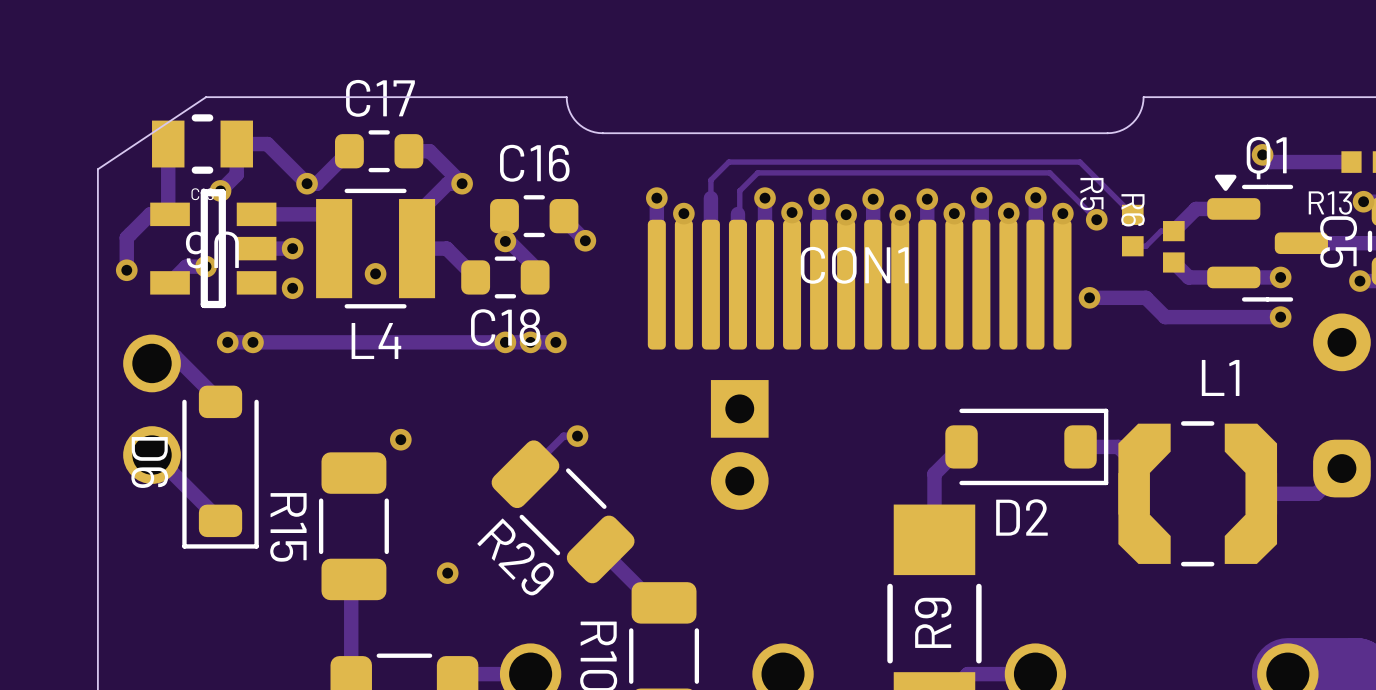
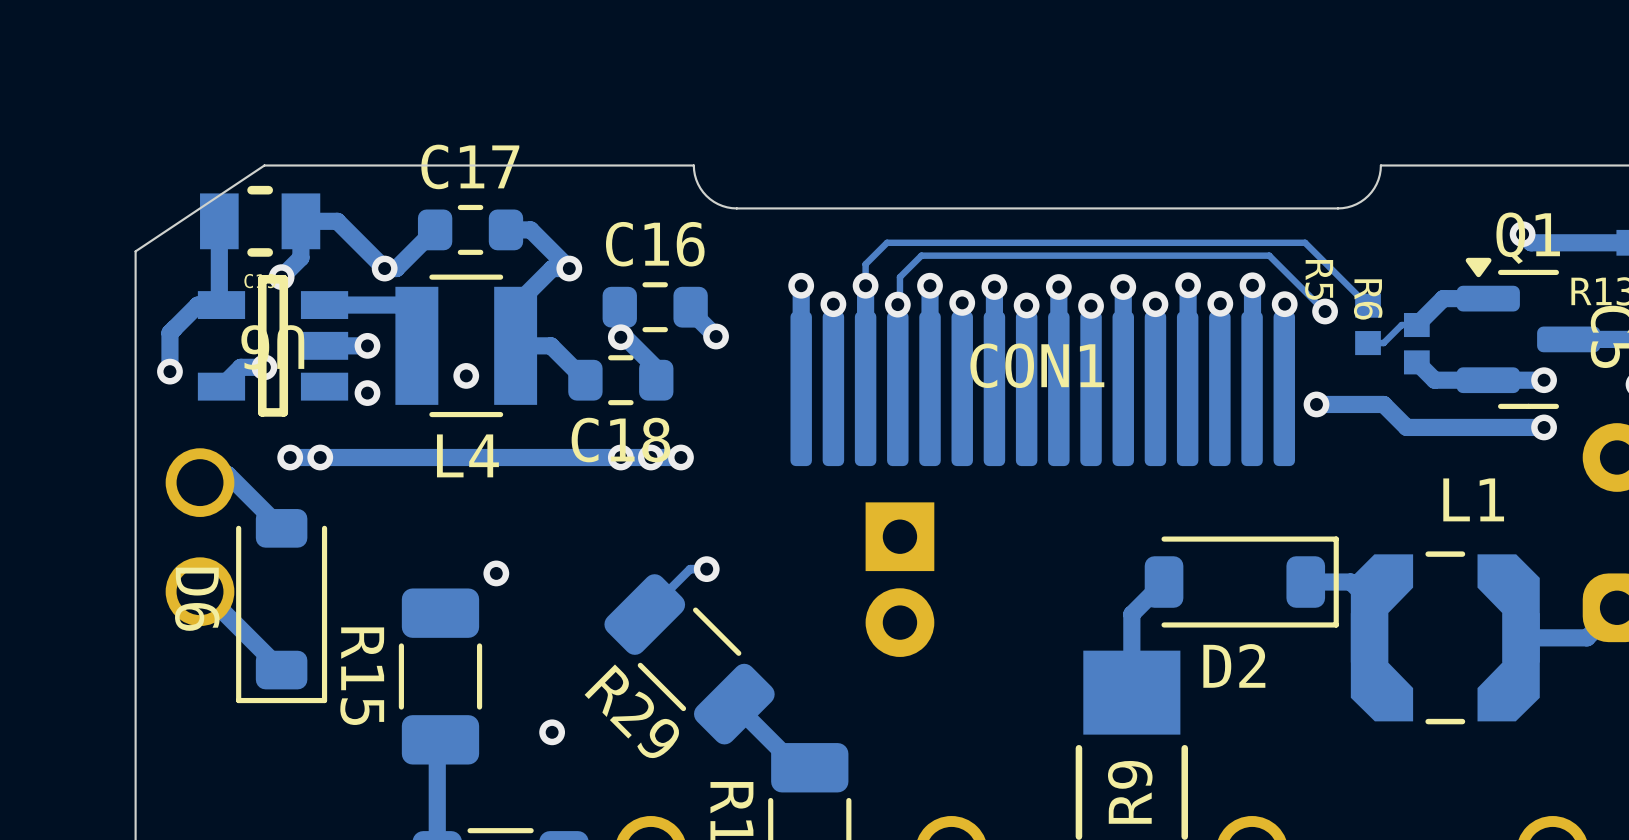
via: none -> (865, 285)
via: none -> (897, 304)

